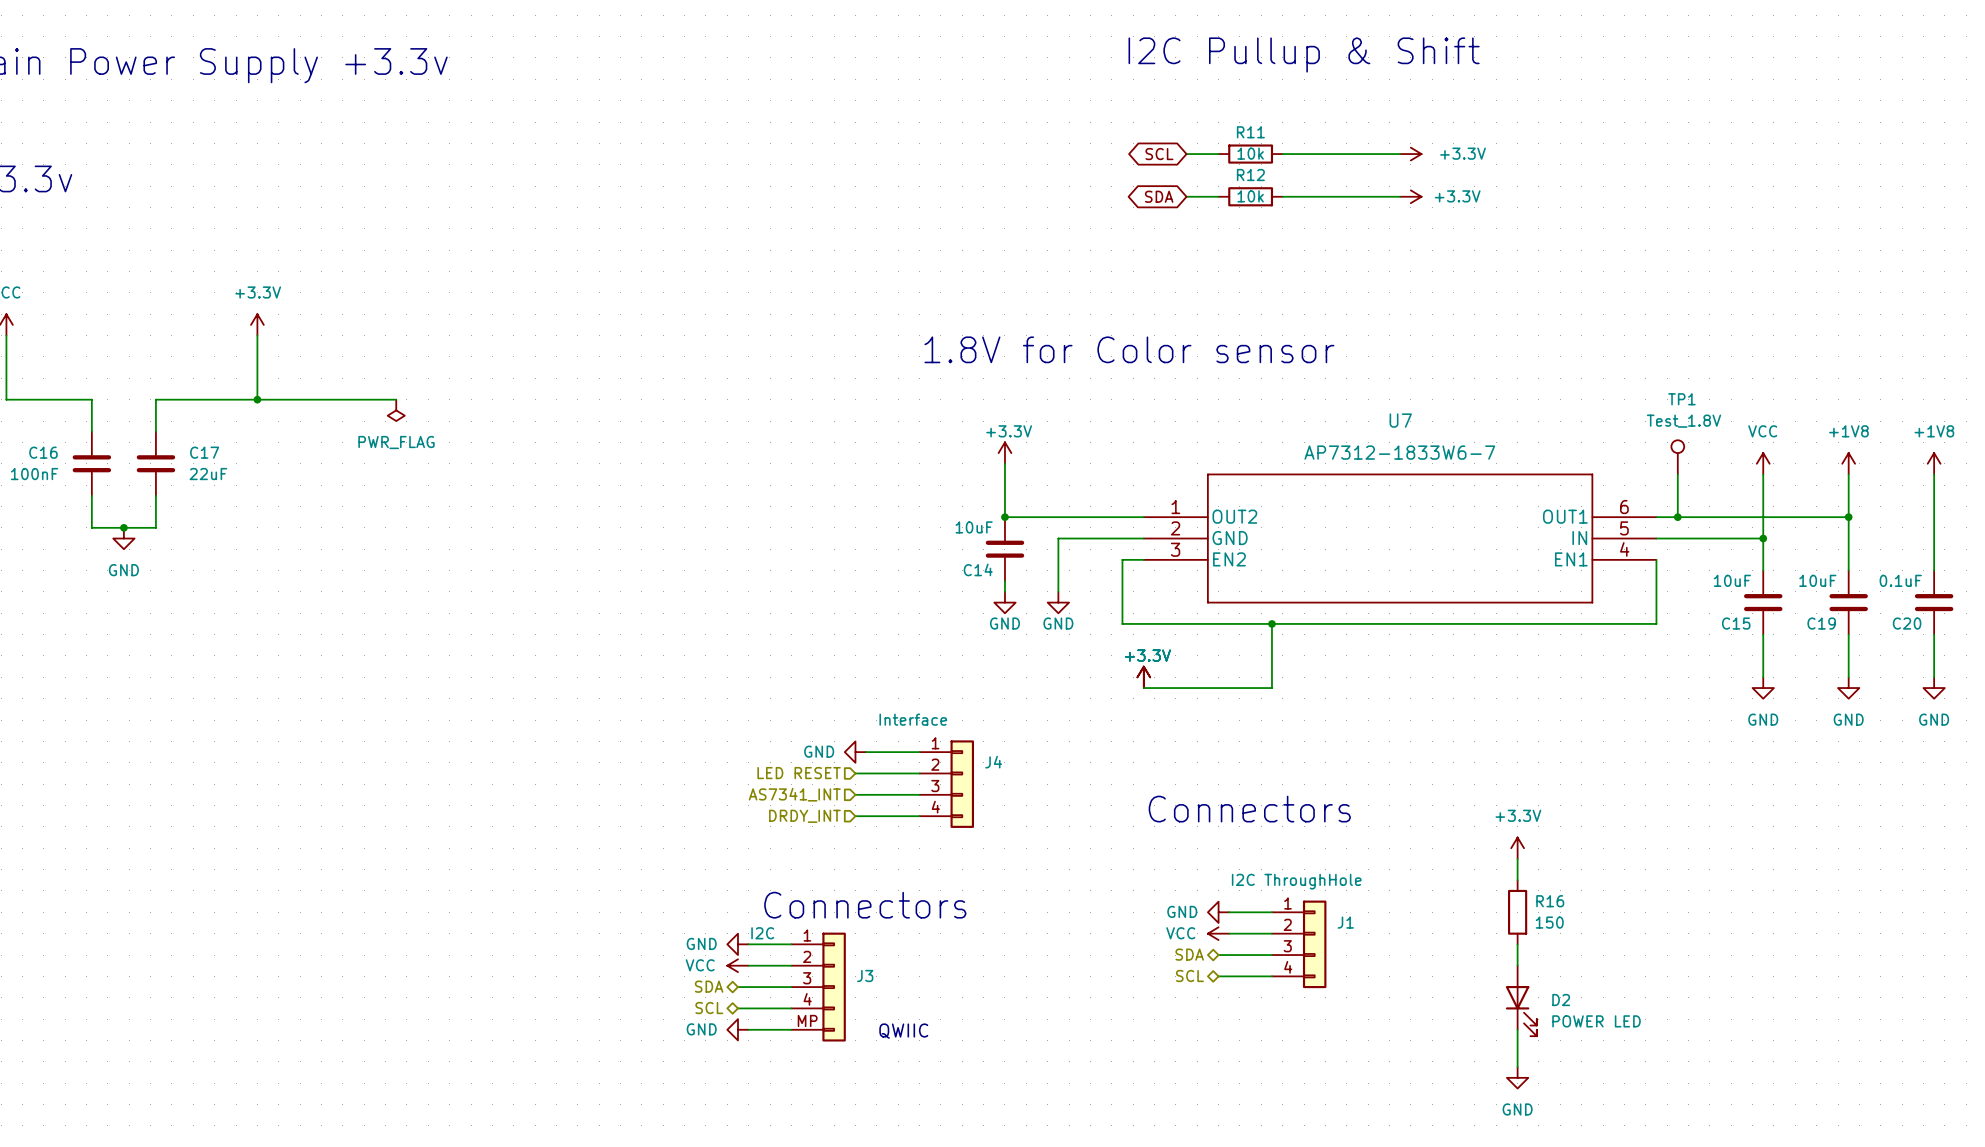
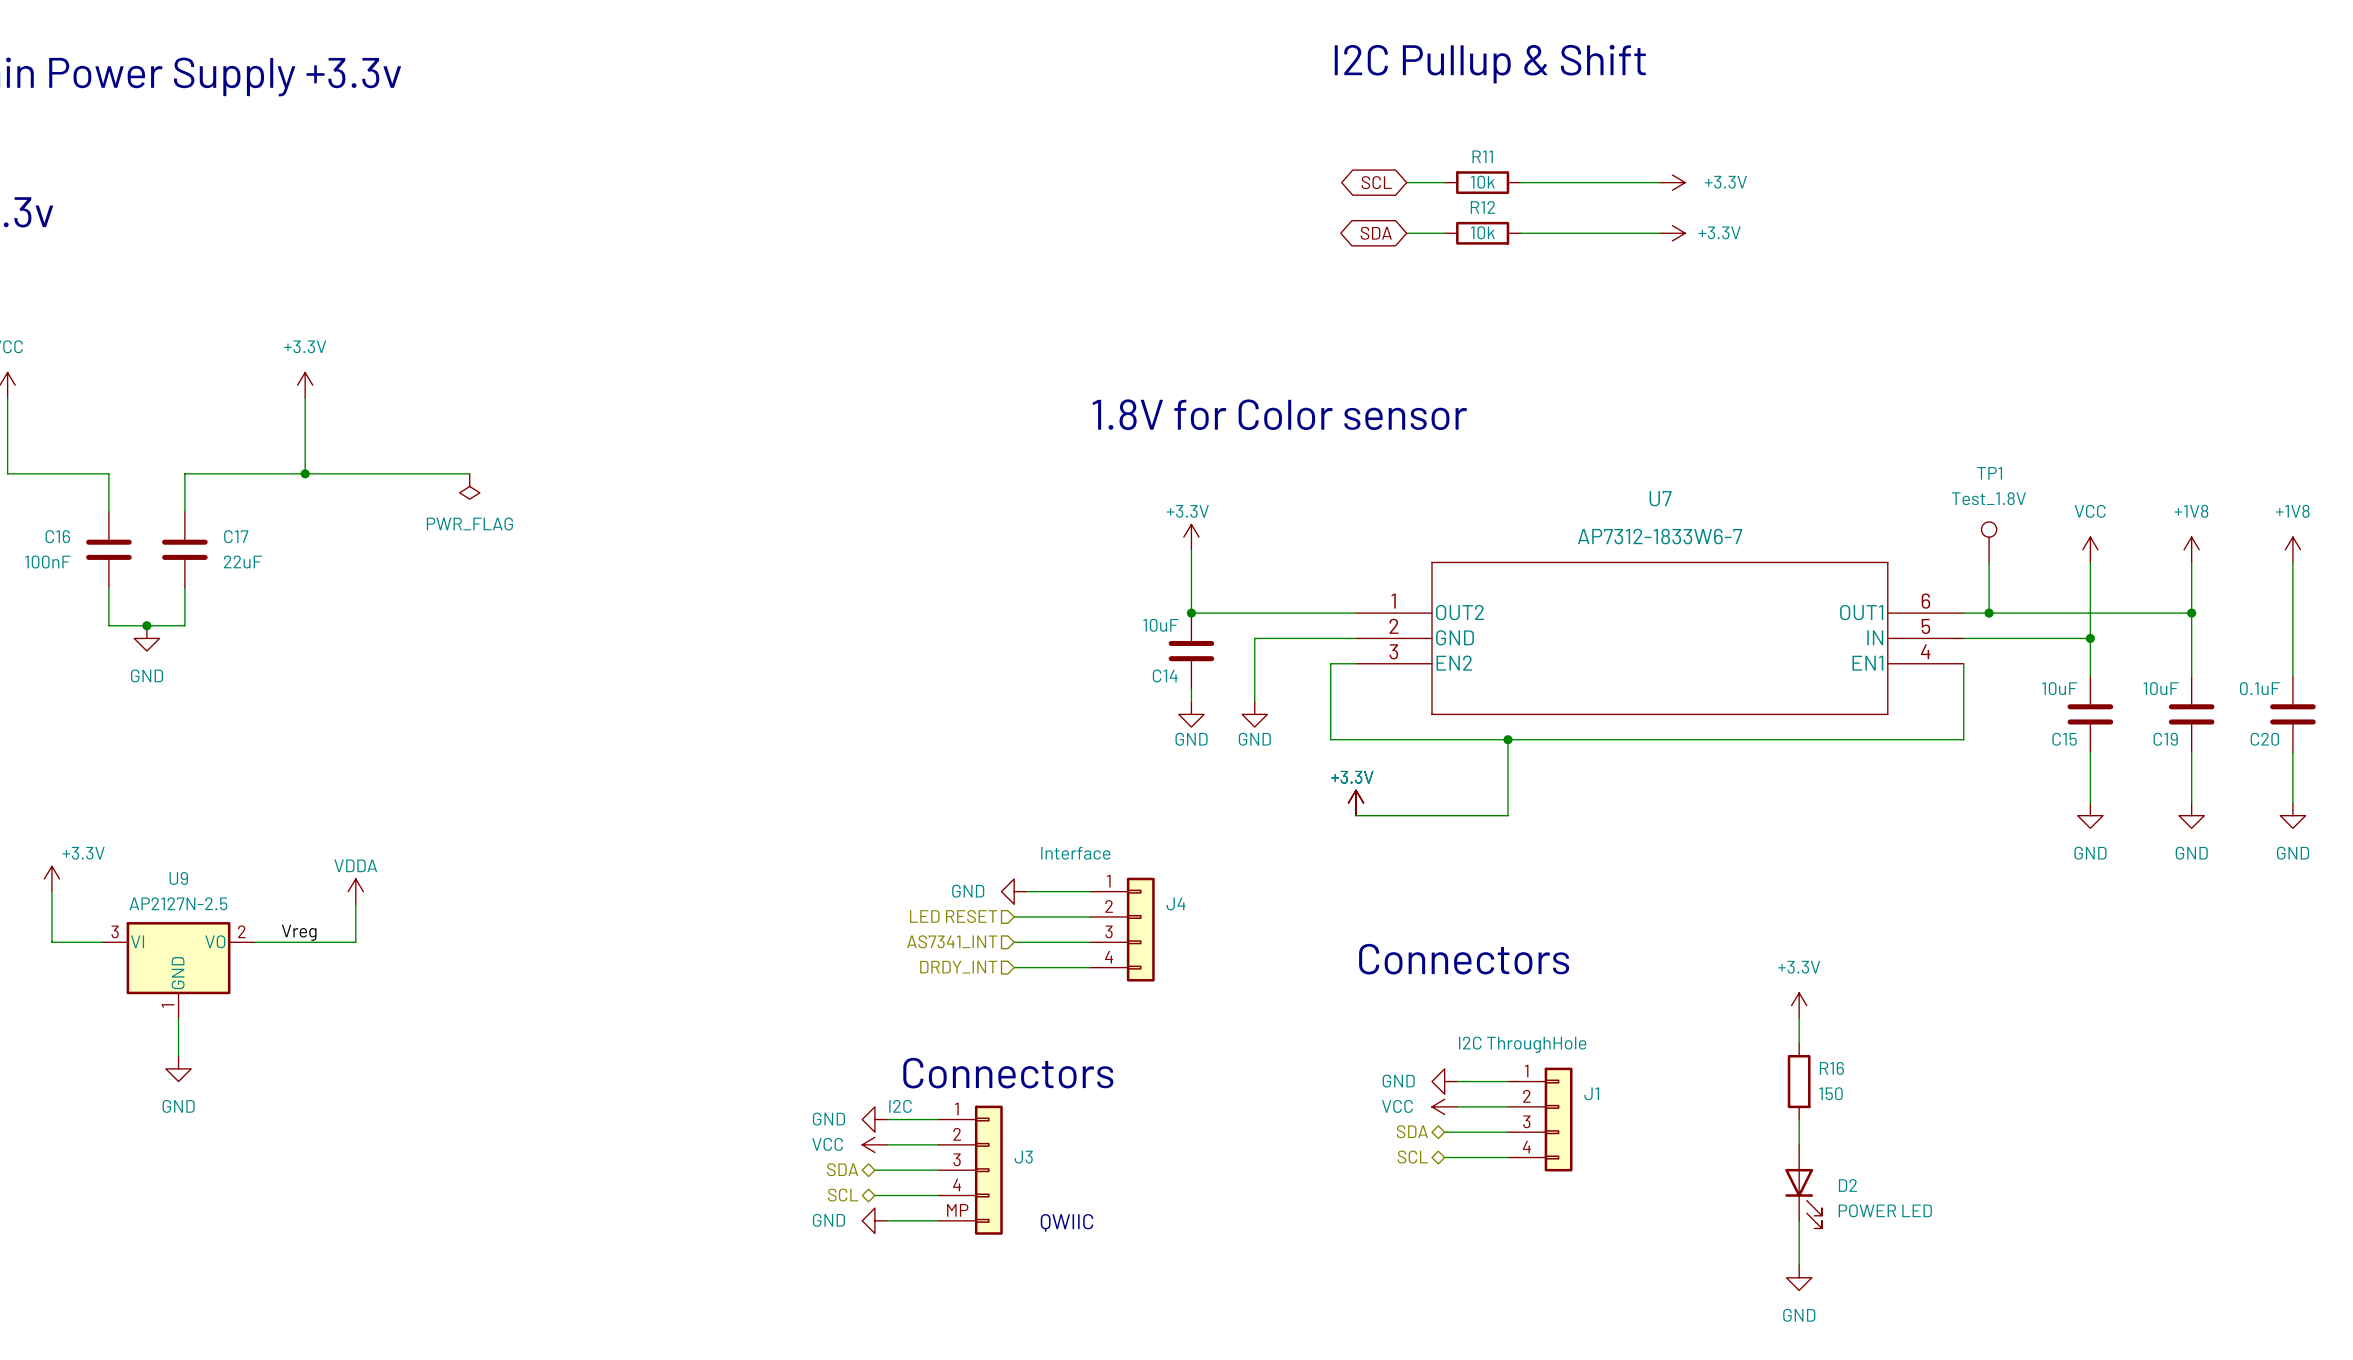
power symbol: none -> +3.3V (51, 878)
wire: none -> (51, 891) (51, 942) (102, 942)
power symbol: none -> VDDA (355, 891)
wire: none -> (355, 904) (355, 942) (254, 942)
label: none -> Vreg (299, 932)
U9: none -> AP2127N-2.5 (178, 970)
wire: none -> (178, 1018) (178, 1056)
power symbol: none -> GND (178, 1068)

